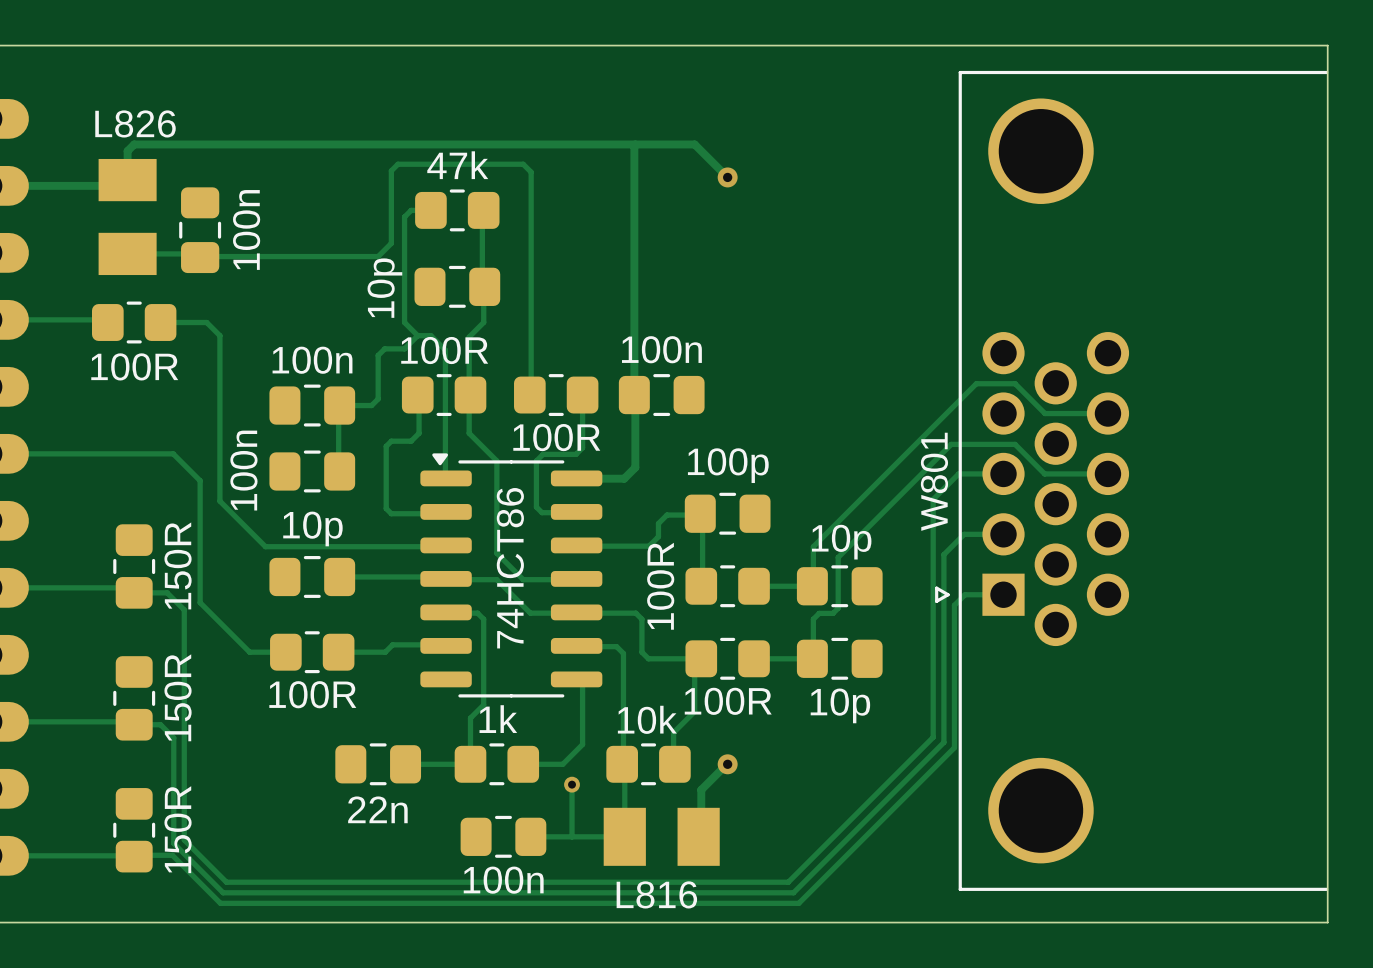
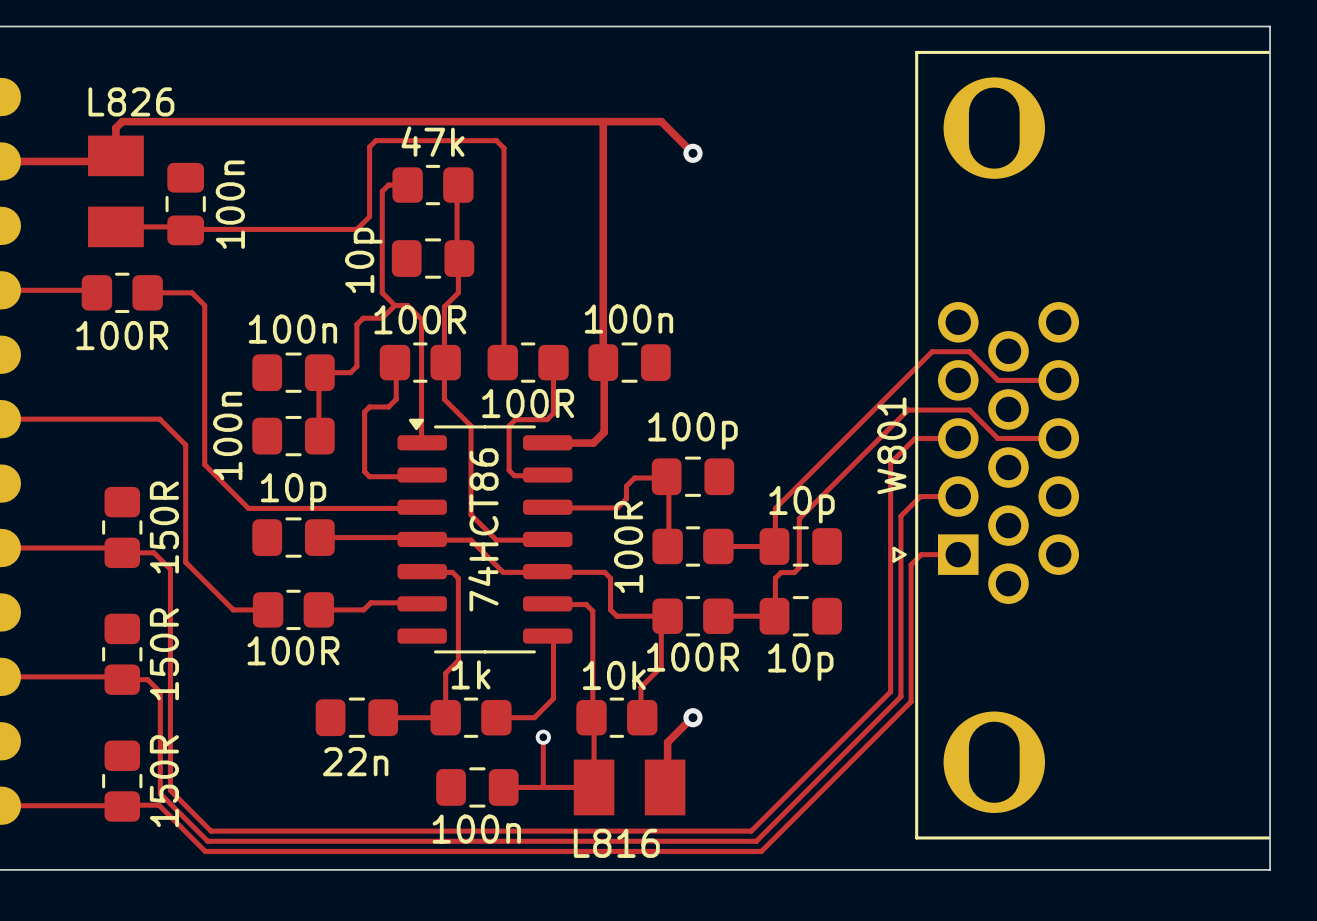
W801 footprint: [935, 70, 1329, 891] -> [892, 50, 1271, 840]

